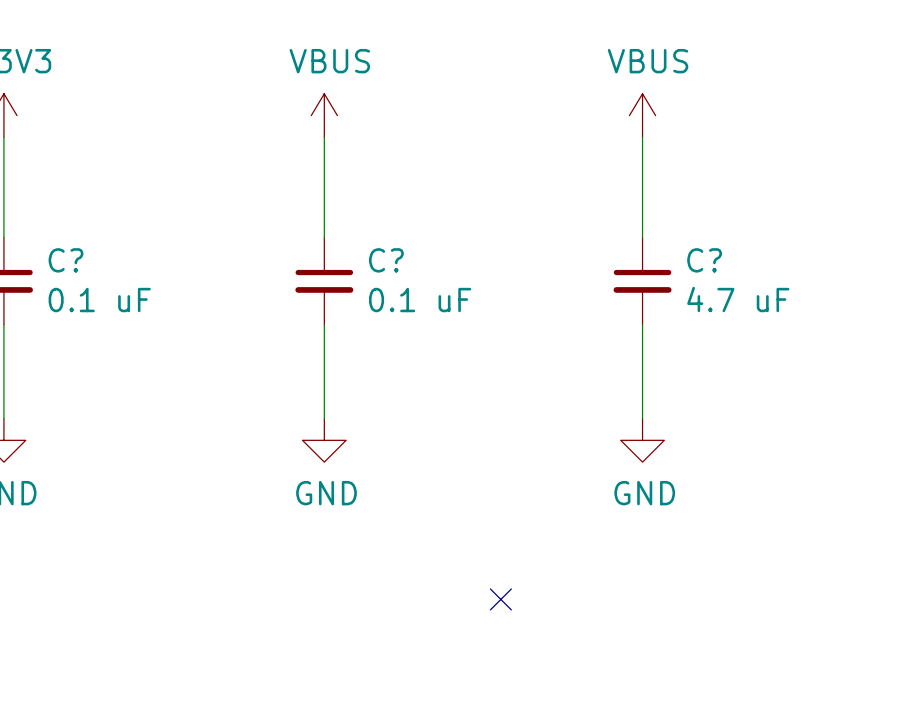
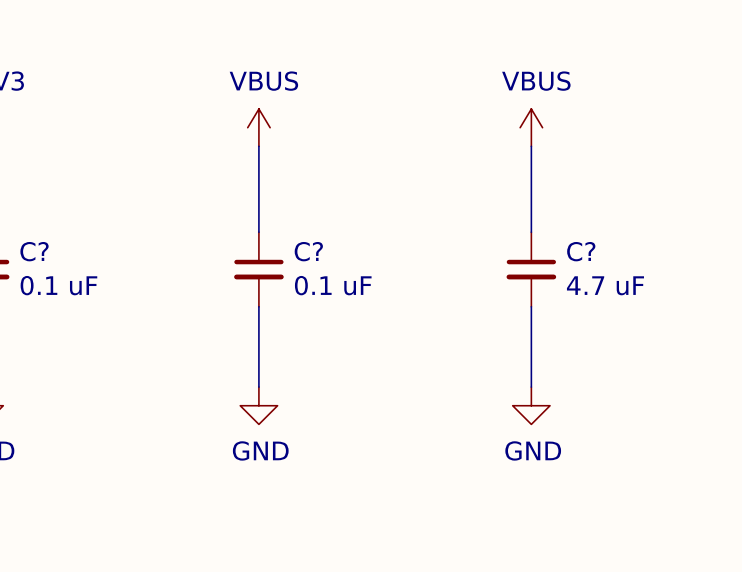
no-connect mark: (500, 599) -> none

